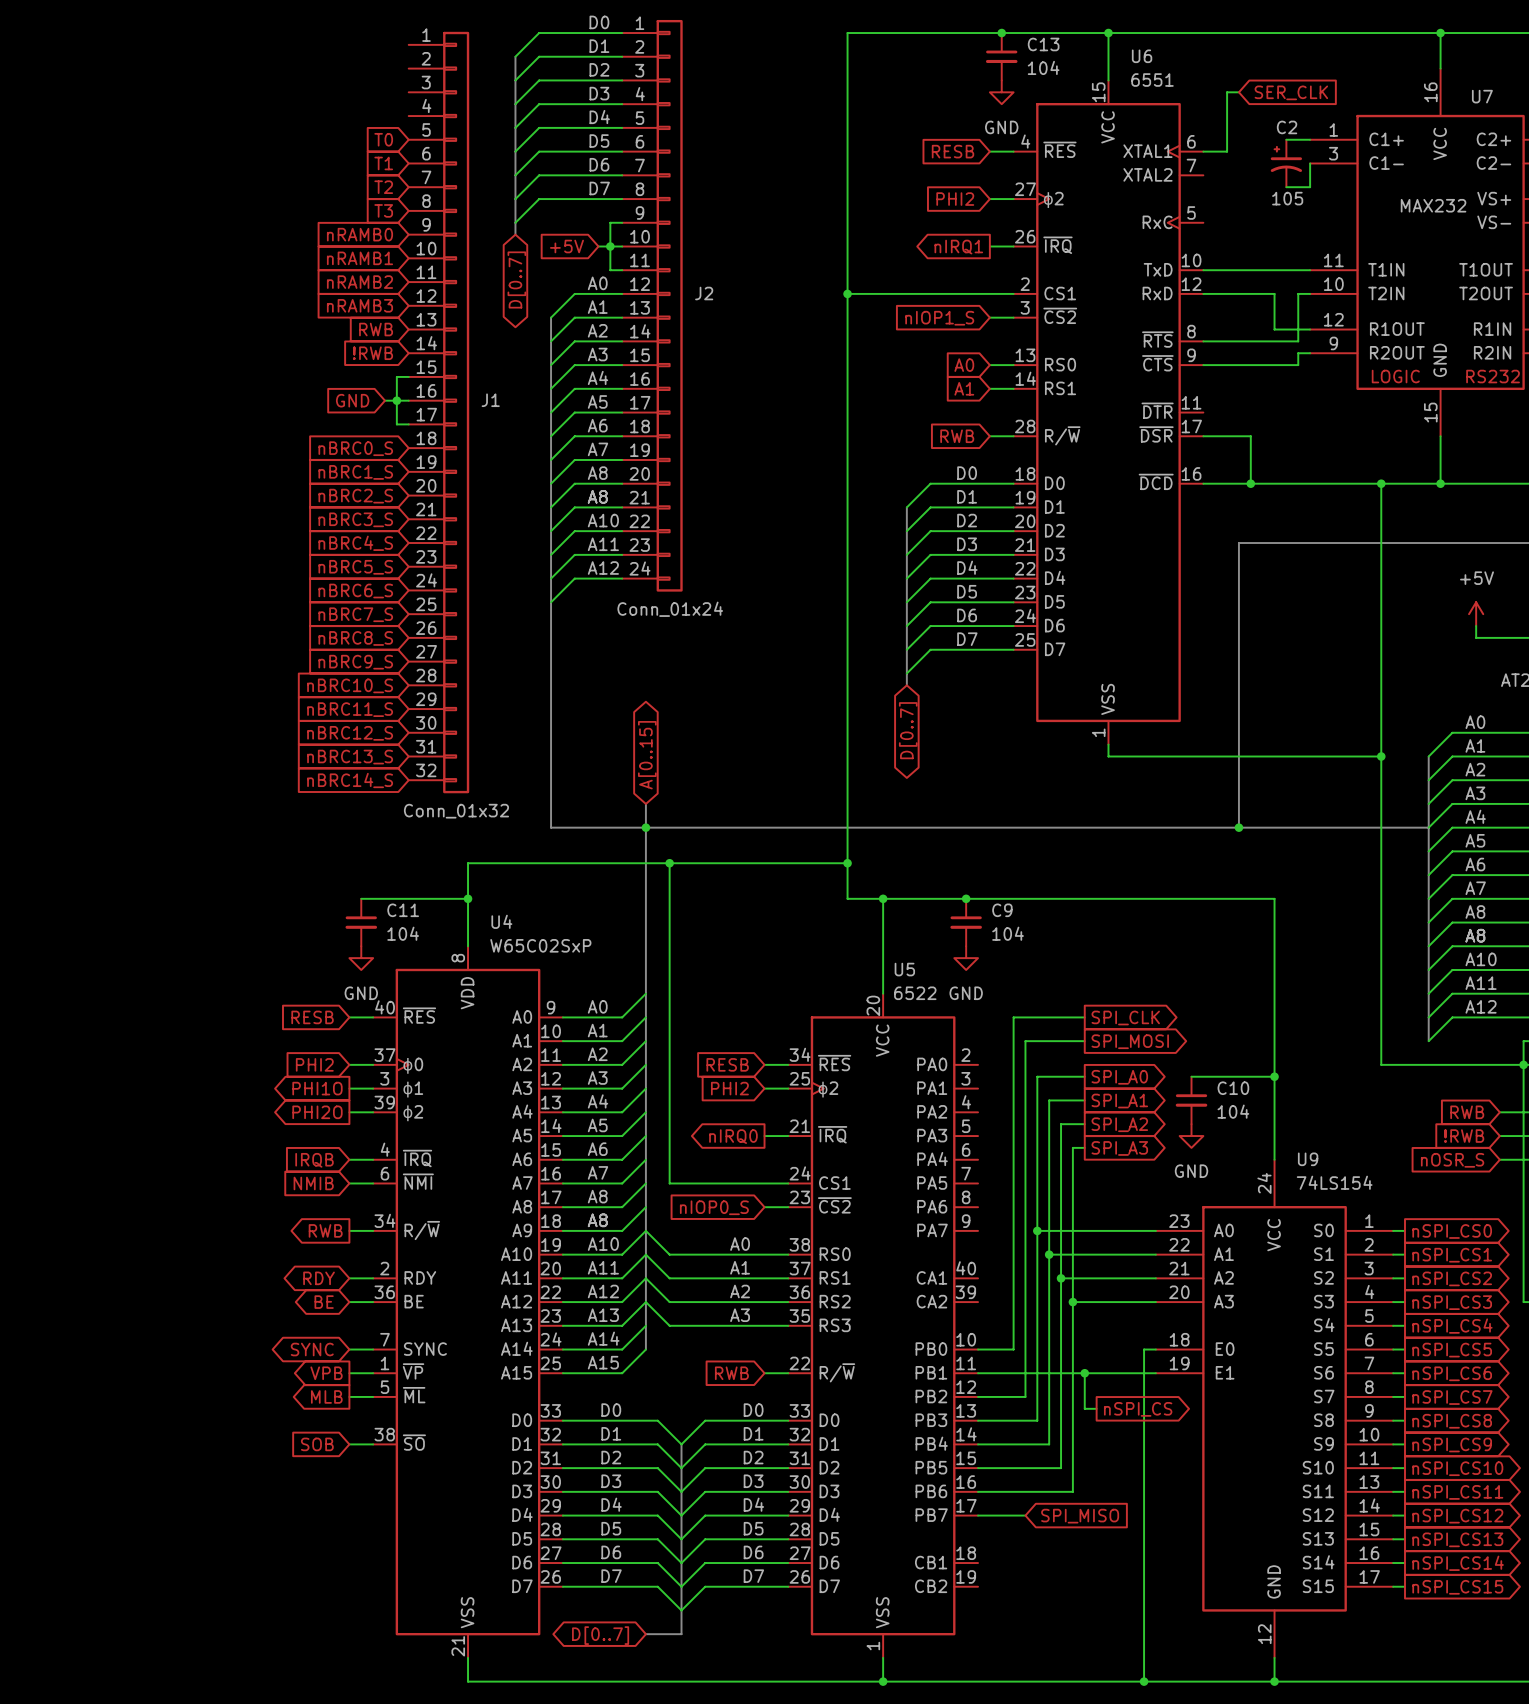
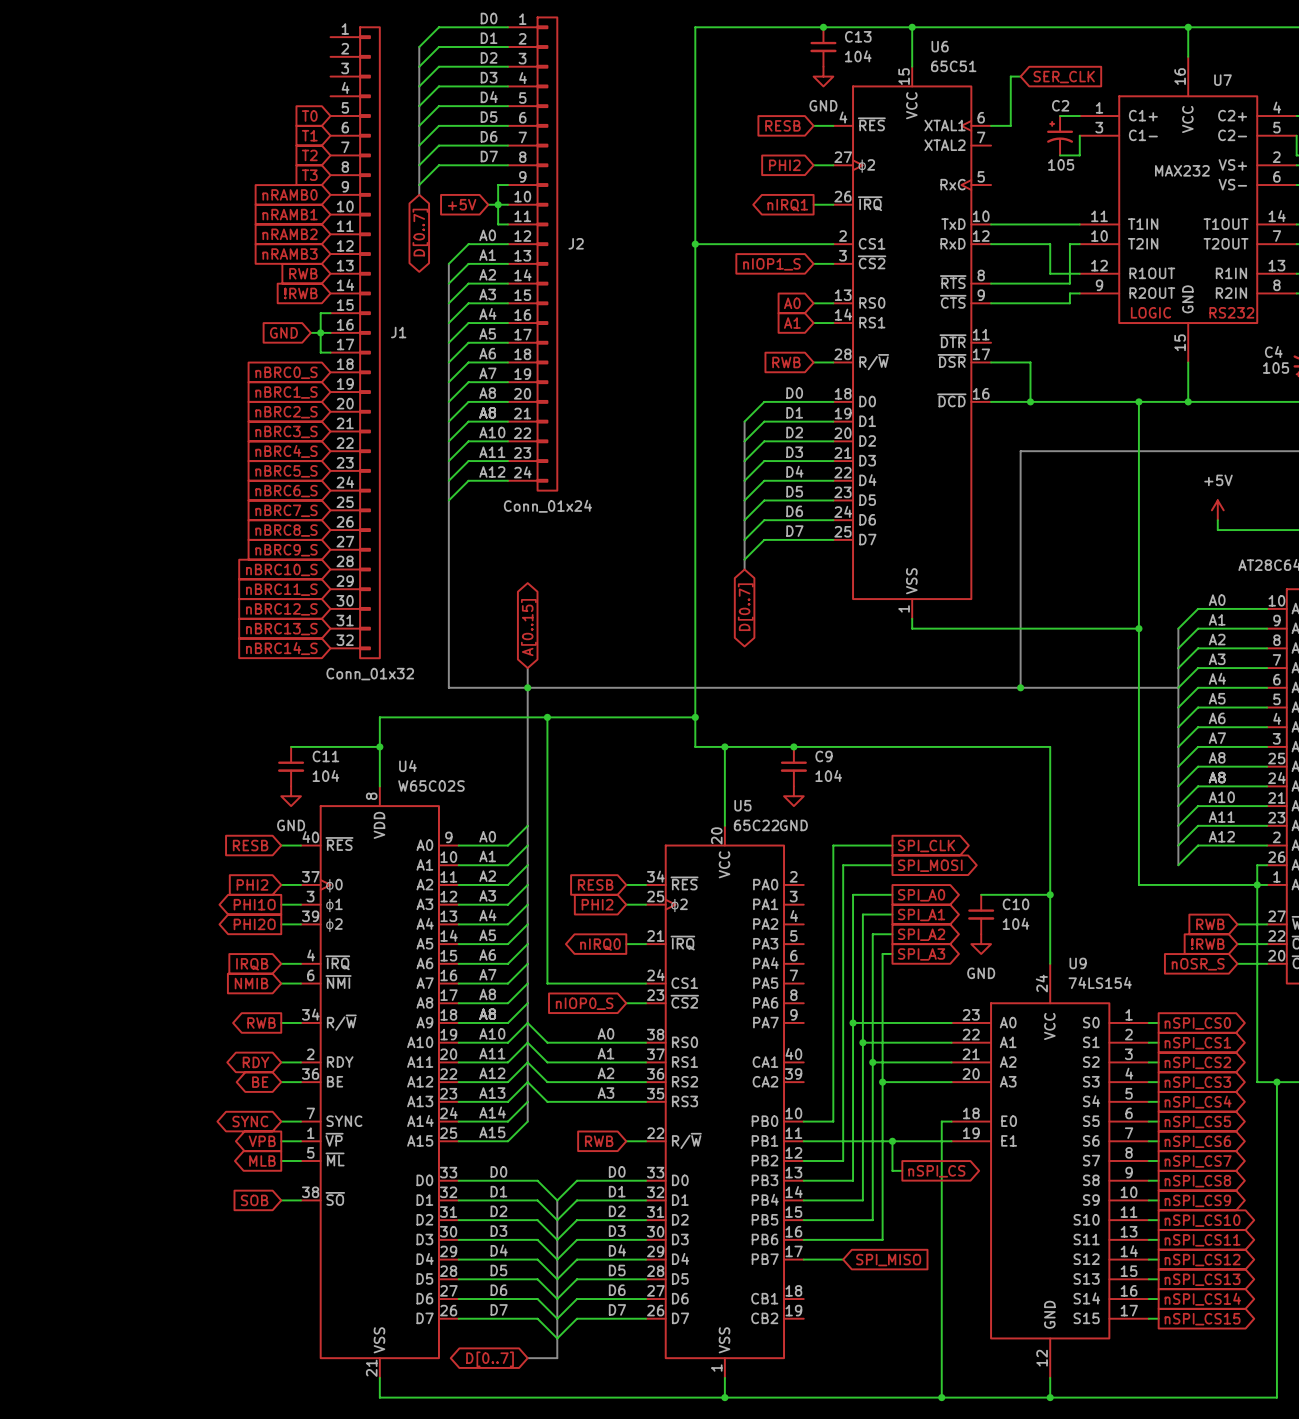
U6 value: 6551 (1152, 80) -> 65C51 (953, 66)
U4 value: W65C02SxP (540, 945) -> W65C02S (431, 786)
U5 value: 6522 (915, 993) -> 65C22 (756, 825)

